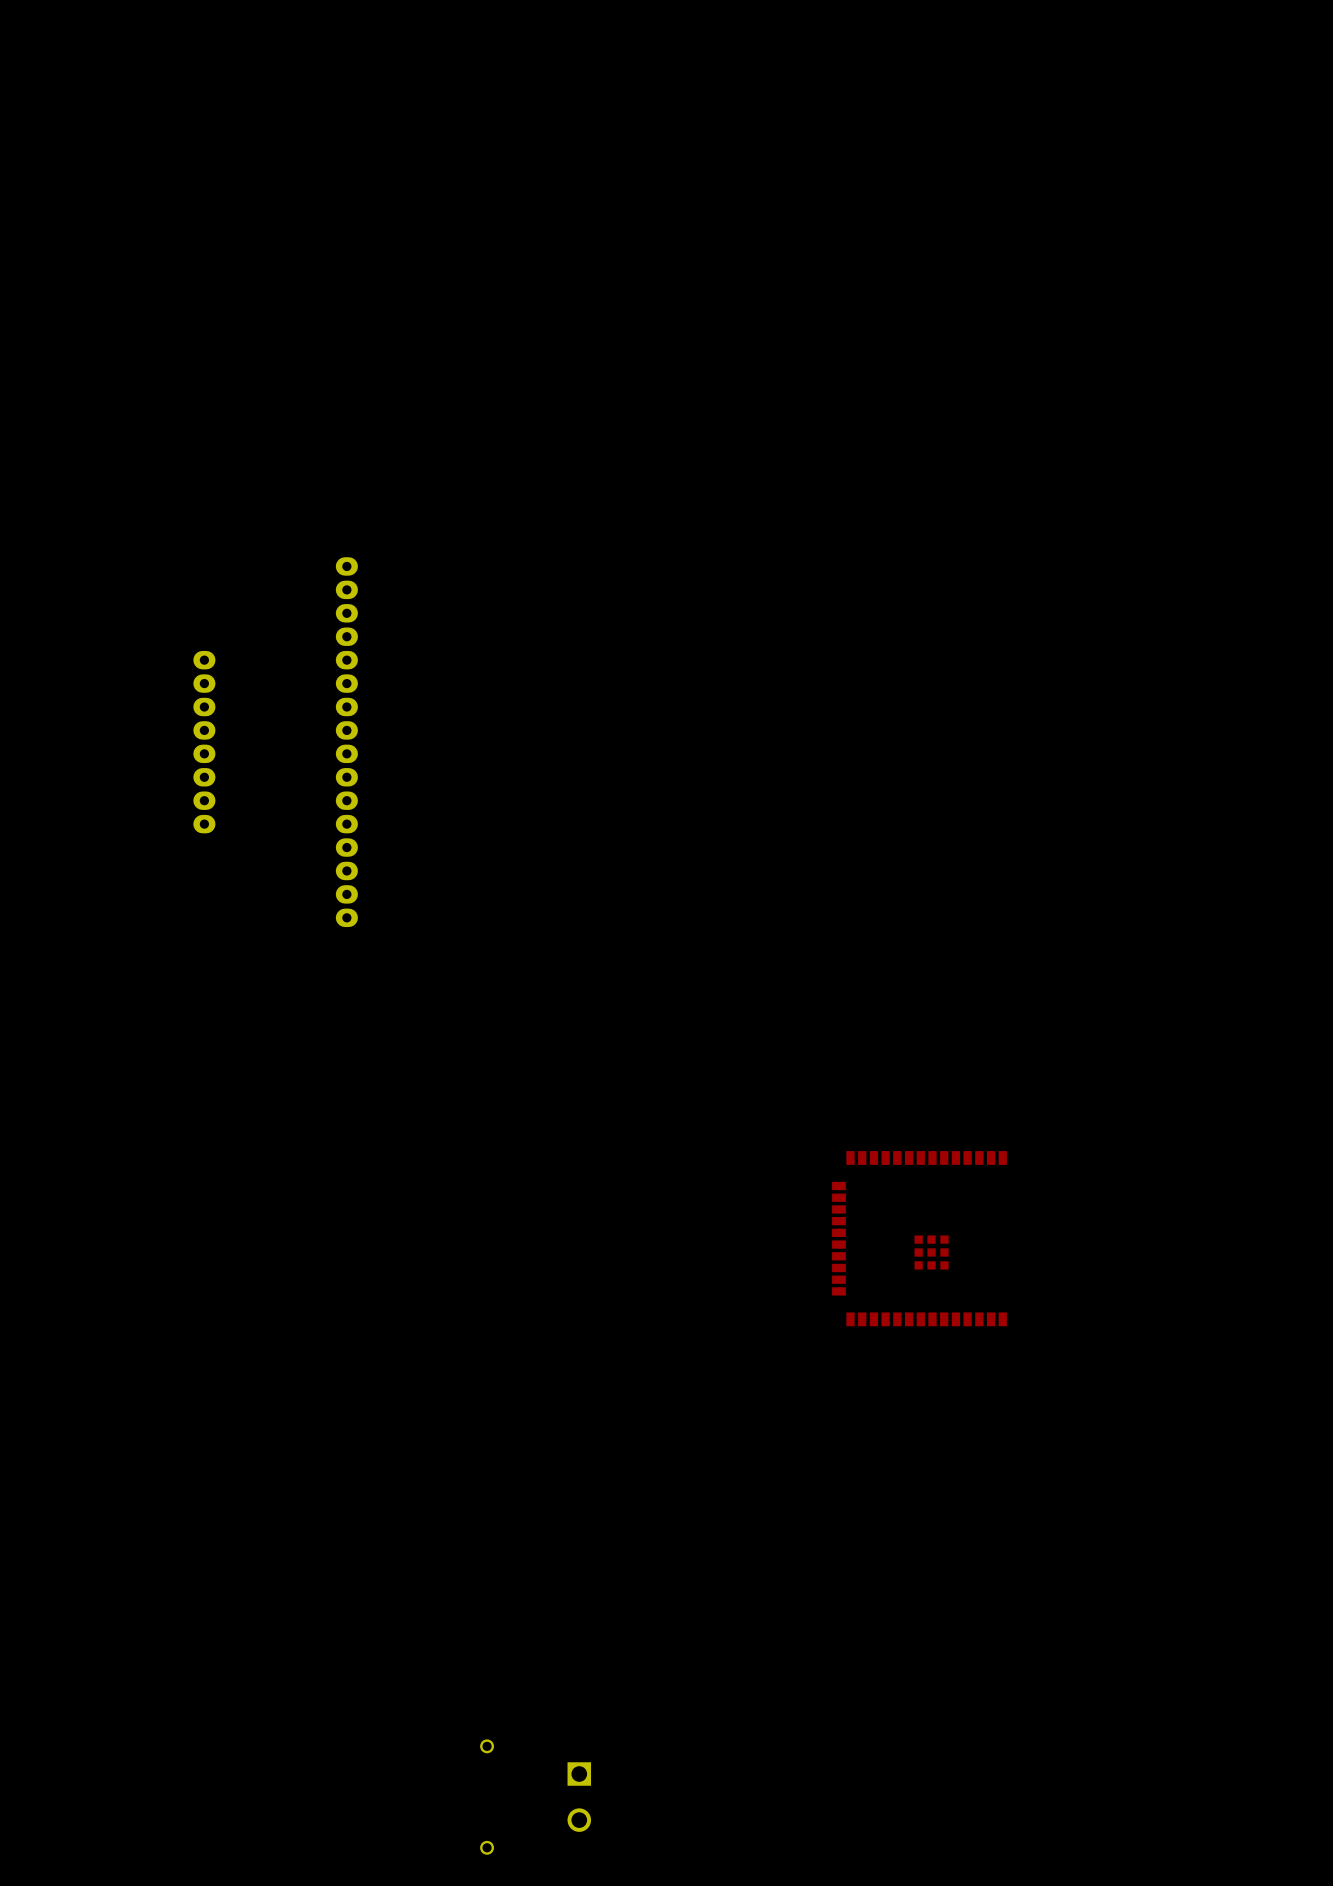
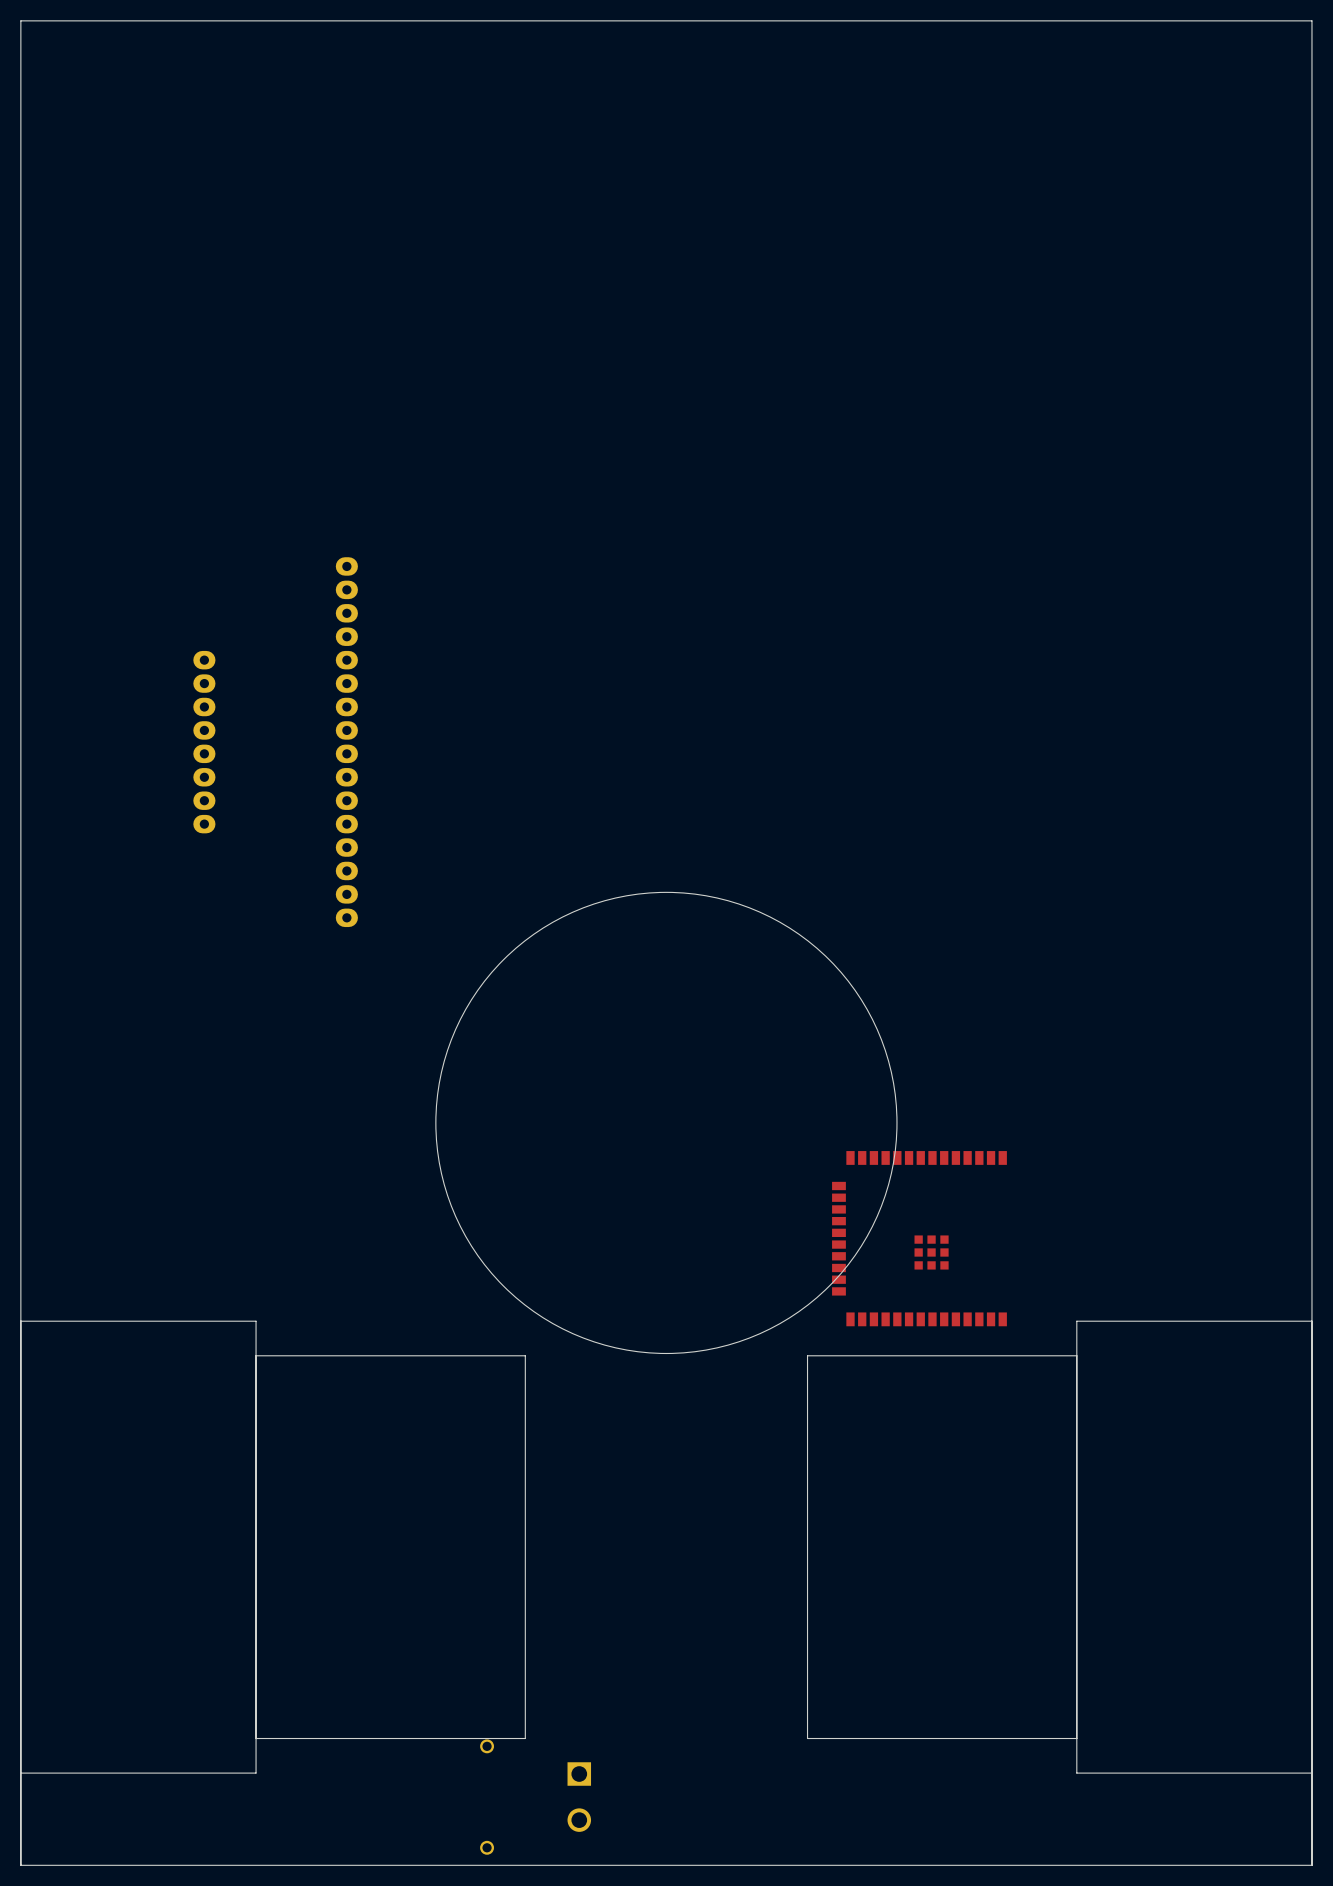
board edge: none -> (1311, 20) (1311, 1865) (20, 1865) (20, 20) (1311, 20)
round board edge: none -> [435, 892, 898, 1354]
board edge: none -> (20, 1321) (256, 1321) (256, 1773) (20, 1773)
board edge: none -> (1311, 1321) (1076, 1321) (1076, 1773) (1311, 1773)
board edge: none -> (256, 1355) (525, 1355) (525, 1738) (256, 1738)
board edge: none -> (1076, 1355) (807, 1355) (807, 1738) (1076, 1738)

